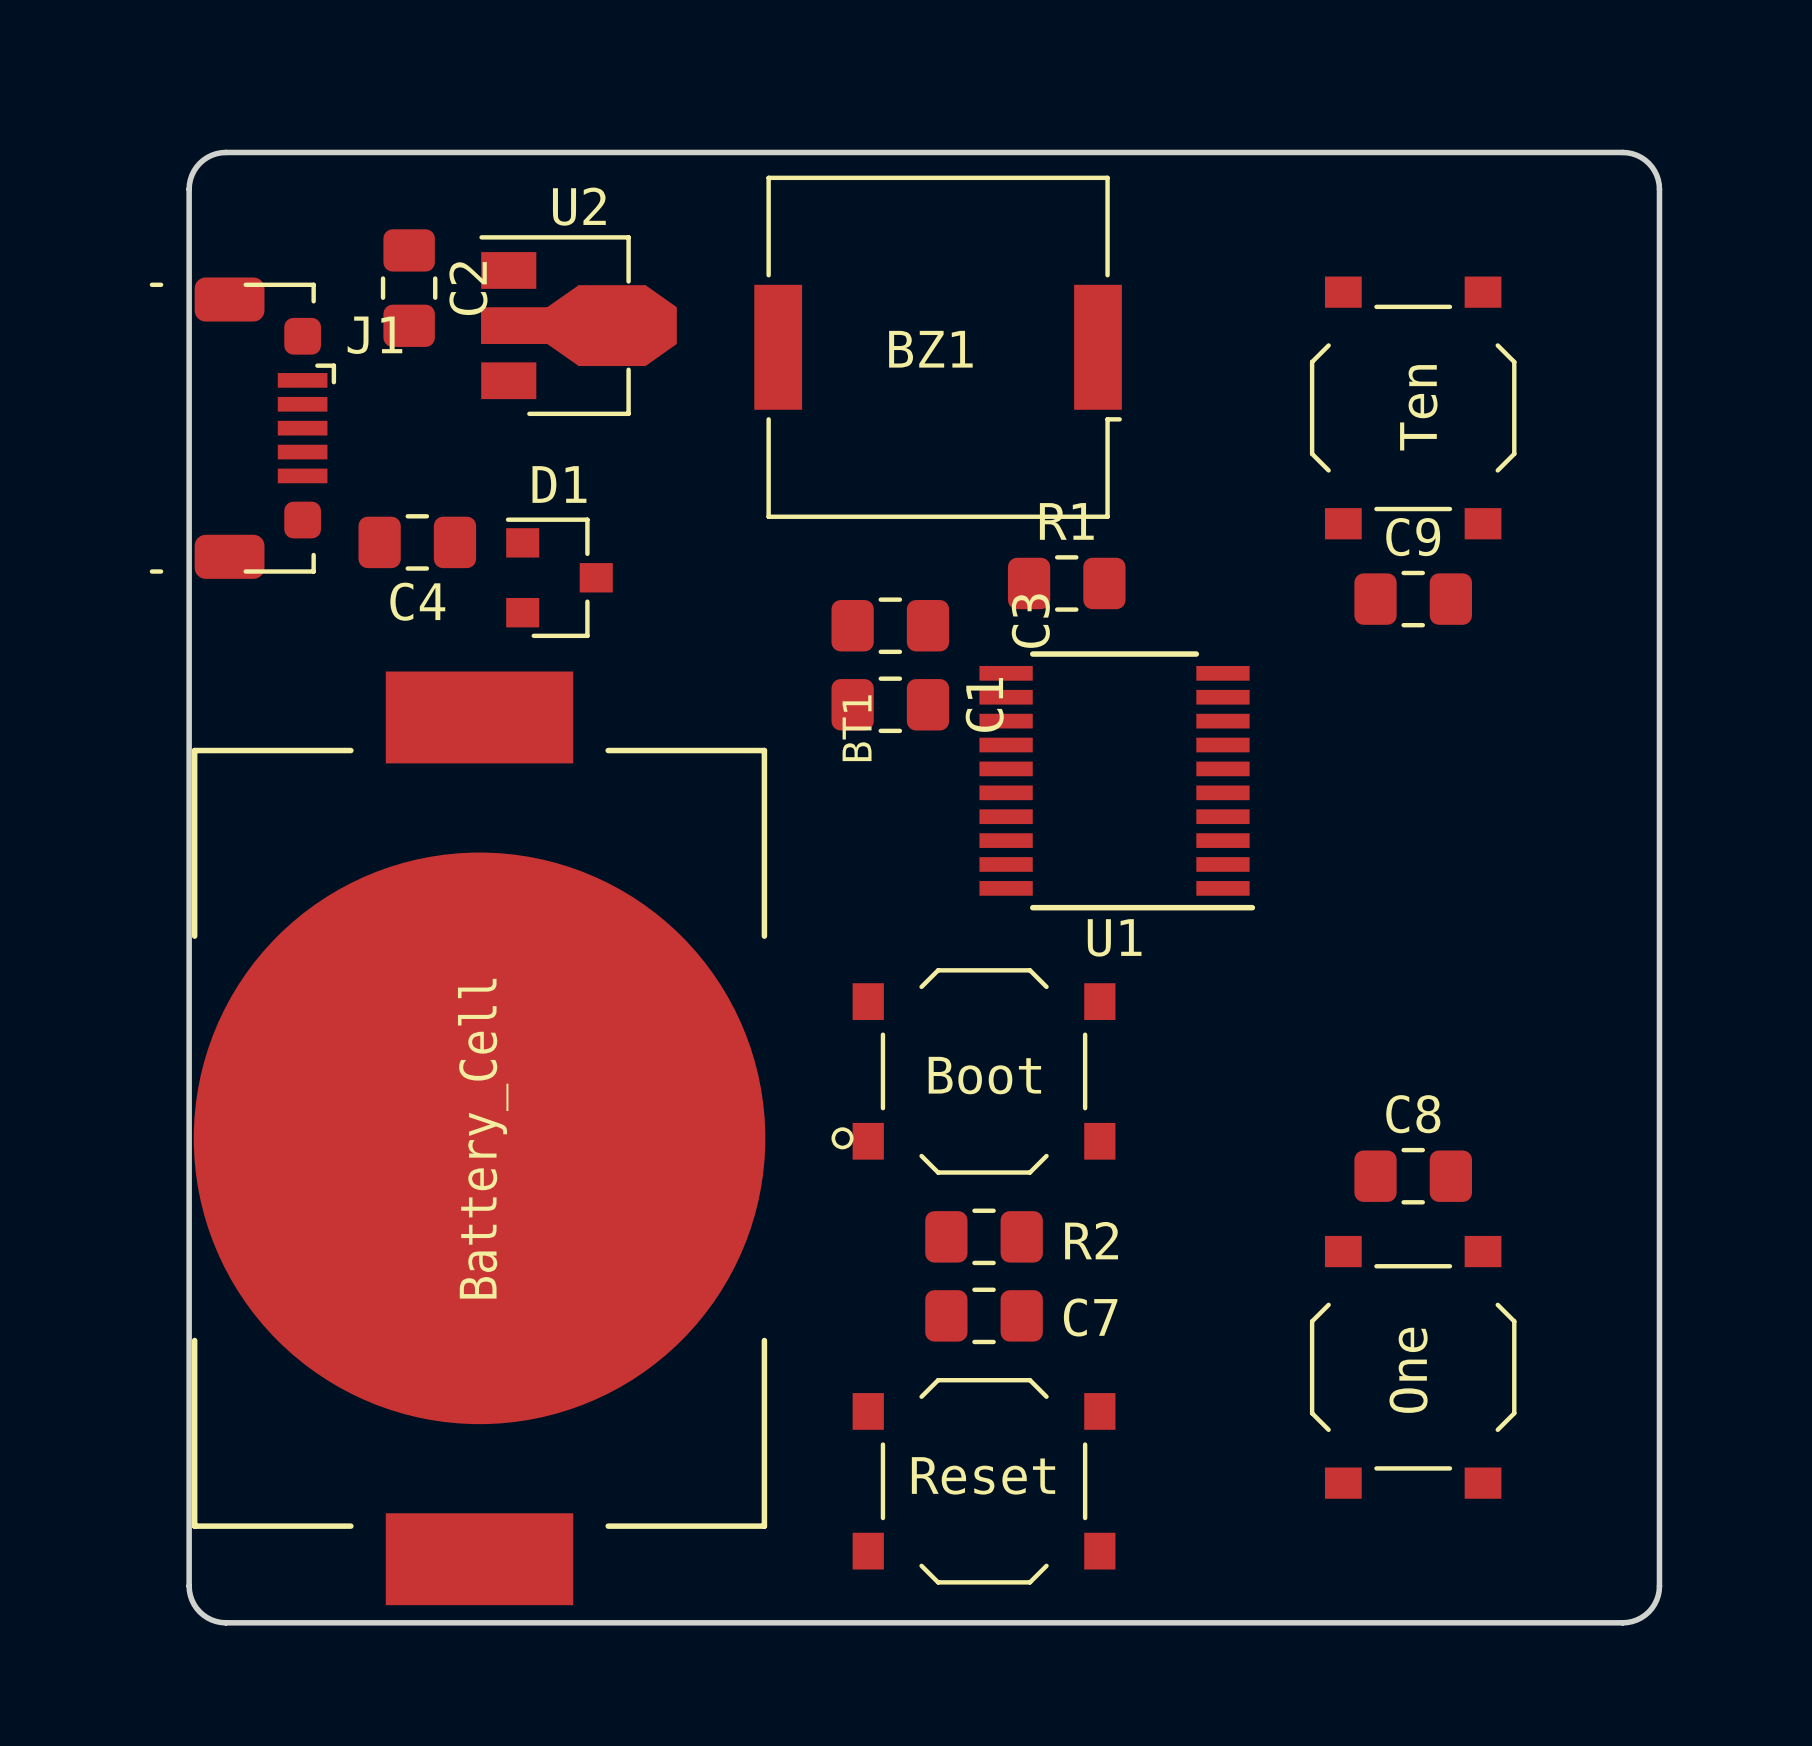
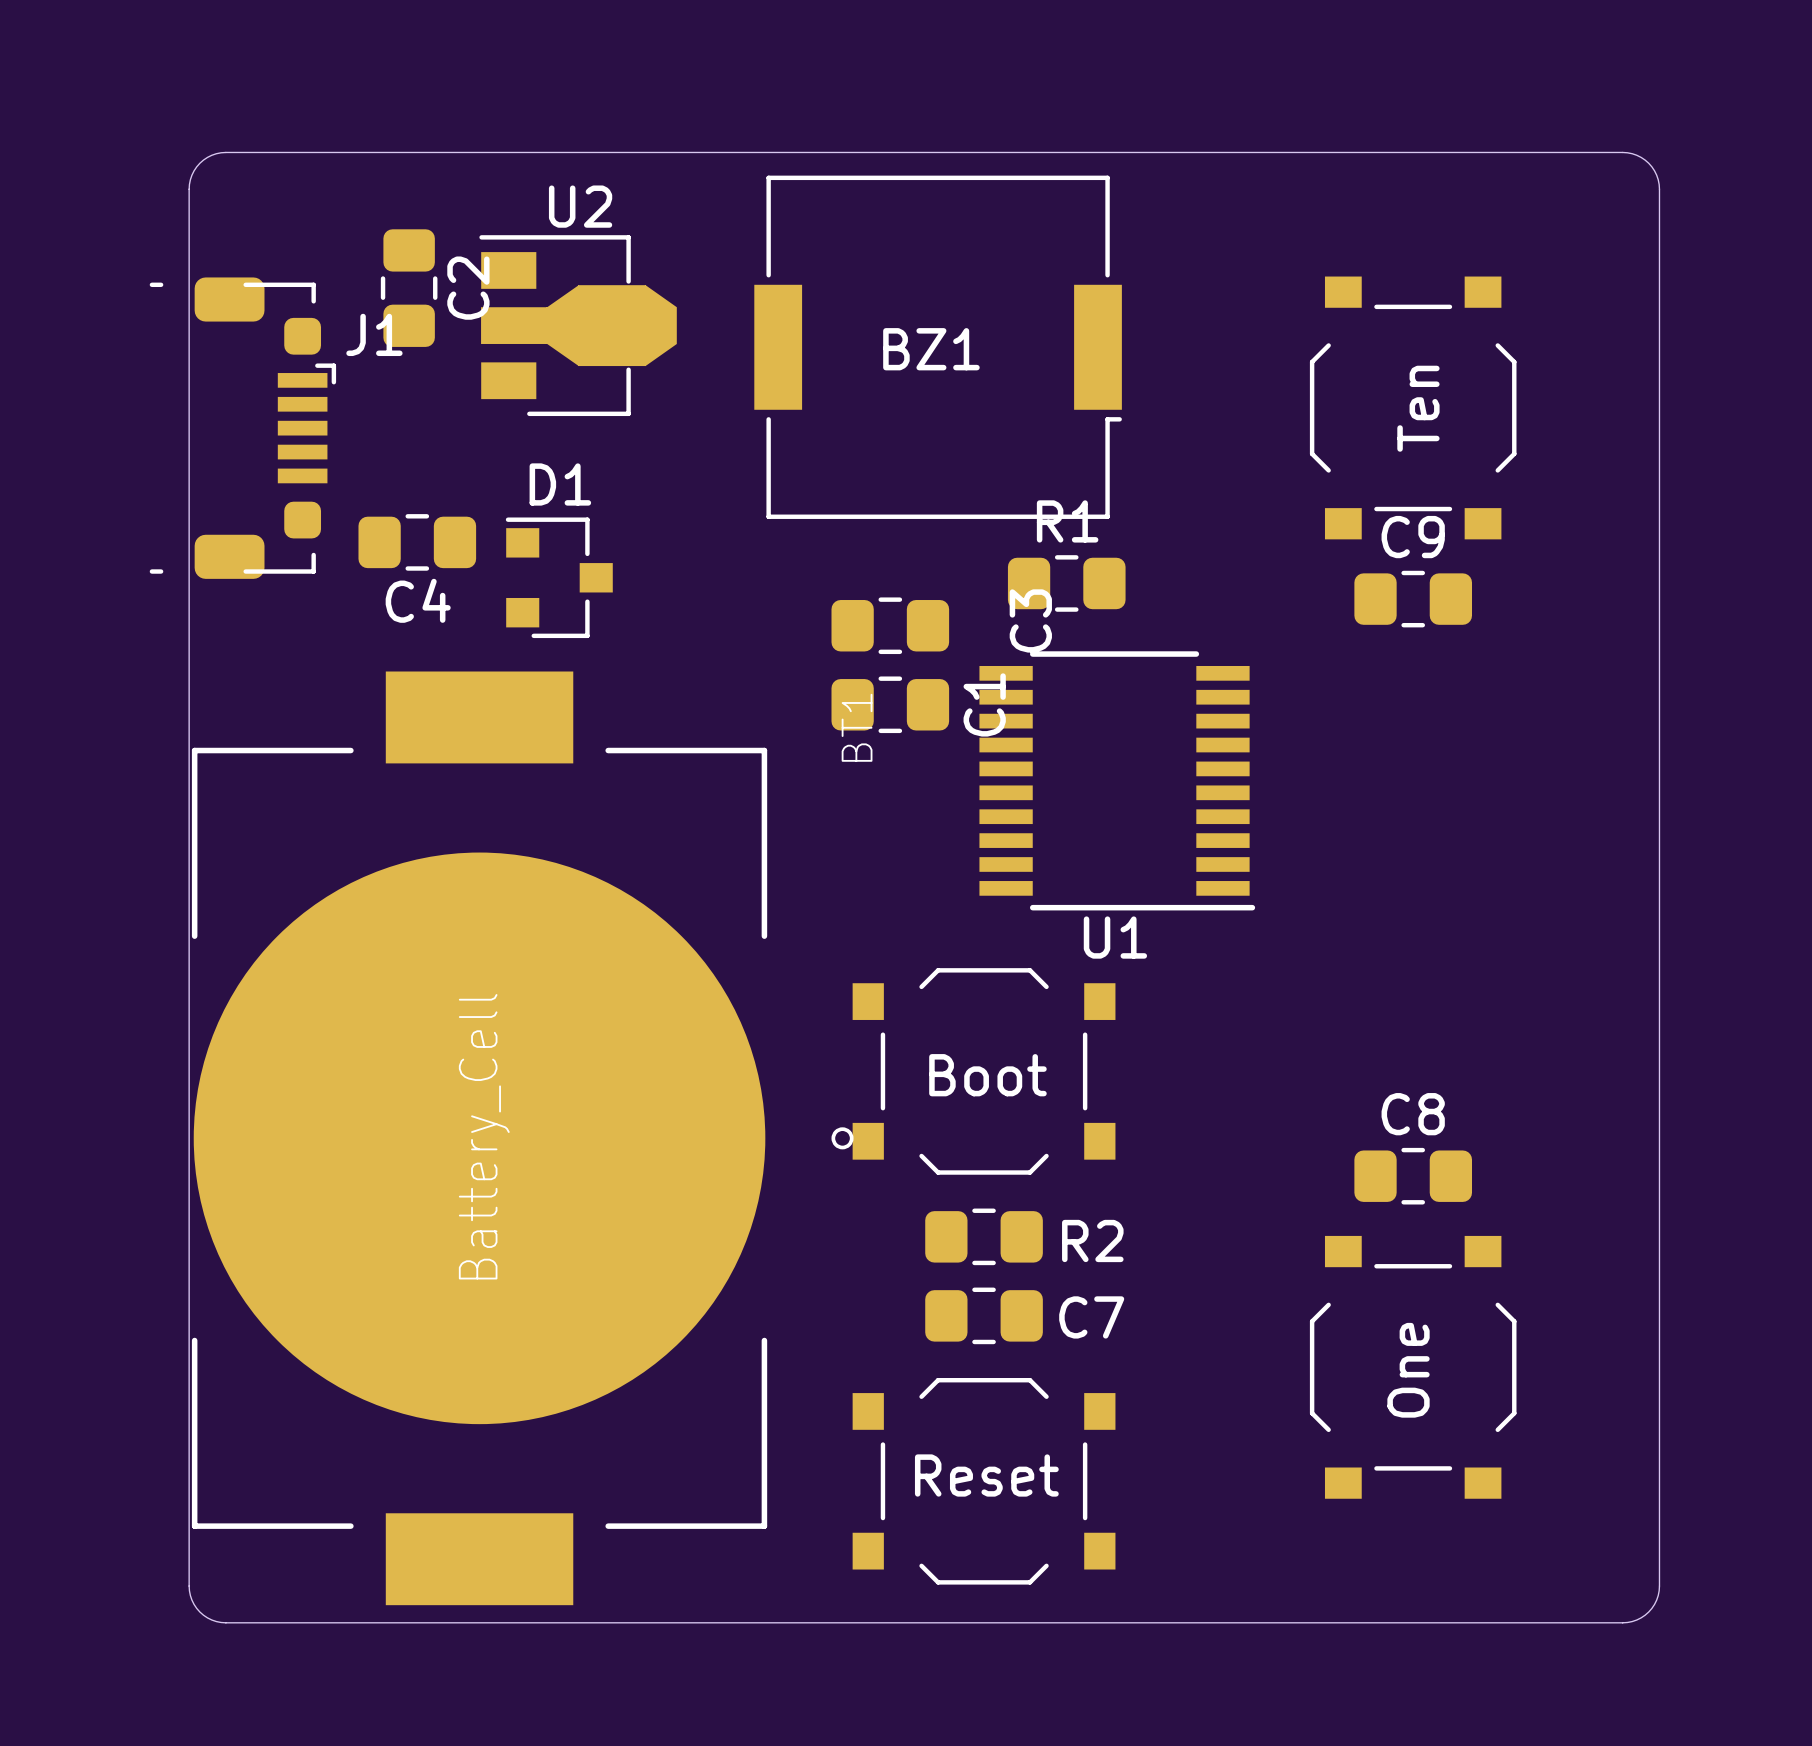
board edge width: thick (225, 152) (1622, 152) (1636, 155) (1648, 163) (1656, 175) (1659, 189) (1659, 1586) (1656, 1600) (1648, 1612) (1636, 1620) (1622, 1622) (225, 1622) (211, 1620) (199, 1612) (191, 1600) (189, 1586) (189, 189) (191, 175) (199, 163) (211, 155) (225, 152) -> thin (225, 152) (1622, 152) (1636, 155) (1648, 163) (1656, 175) (1659, 189) (1659, 1586) (1656, 1600) (1648, 1612) (1636, 1620) (1622, 1622) (225, 1622) (211, 1620) (199, 1612) (191, 1600) (189, 1586) (189, 189) (191, 175) (199, 163) (211, 155) (225, 152)

